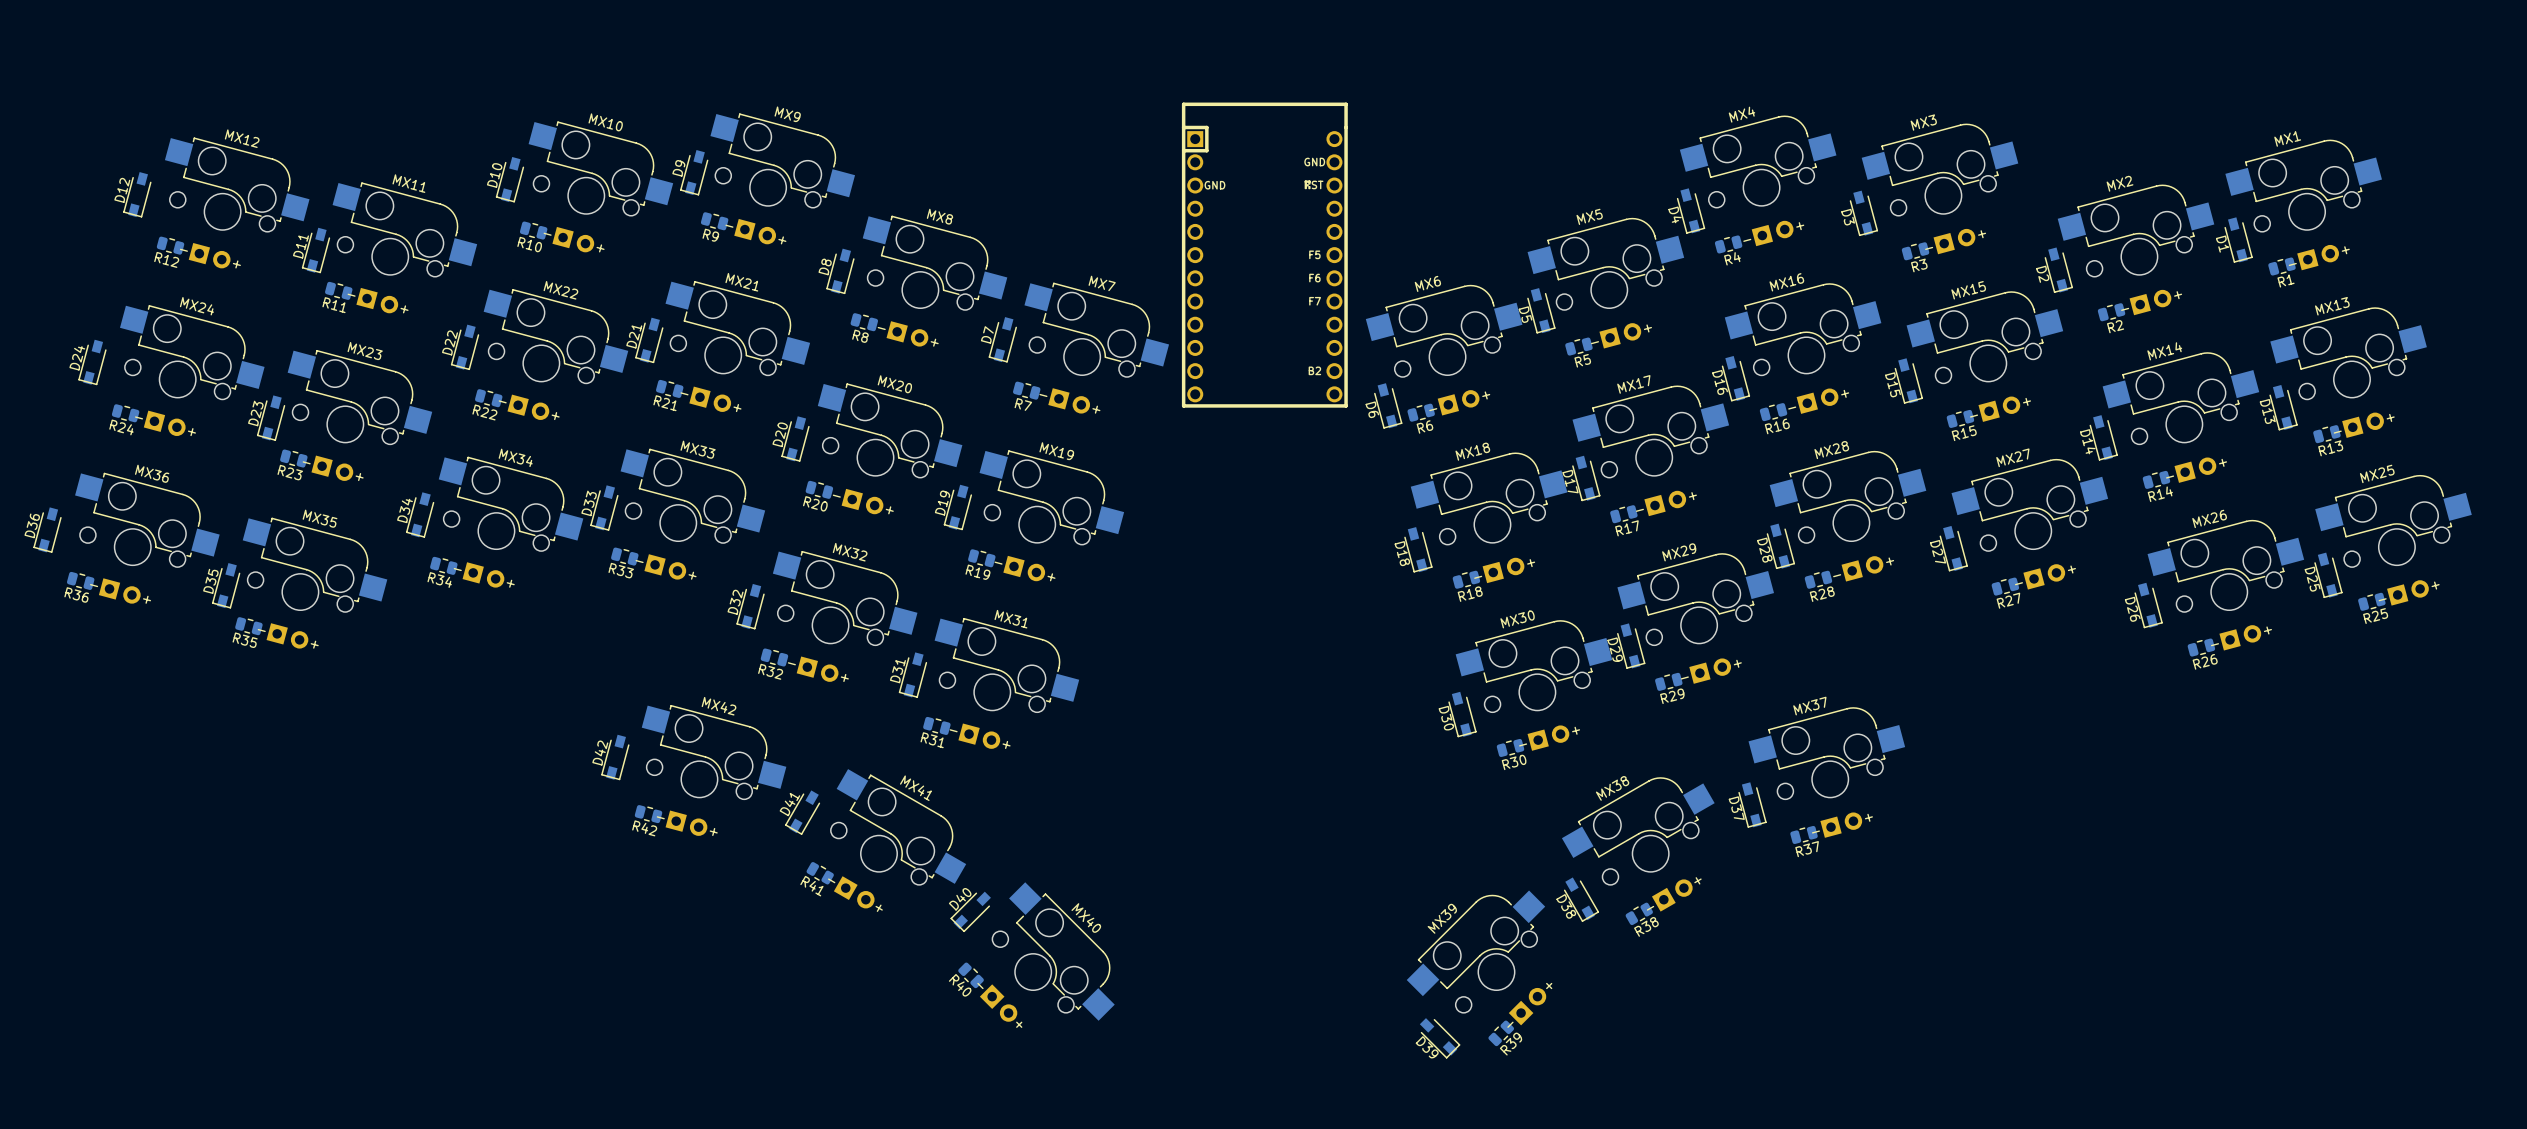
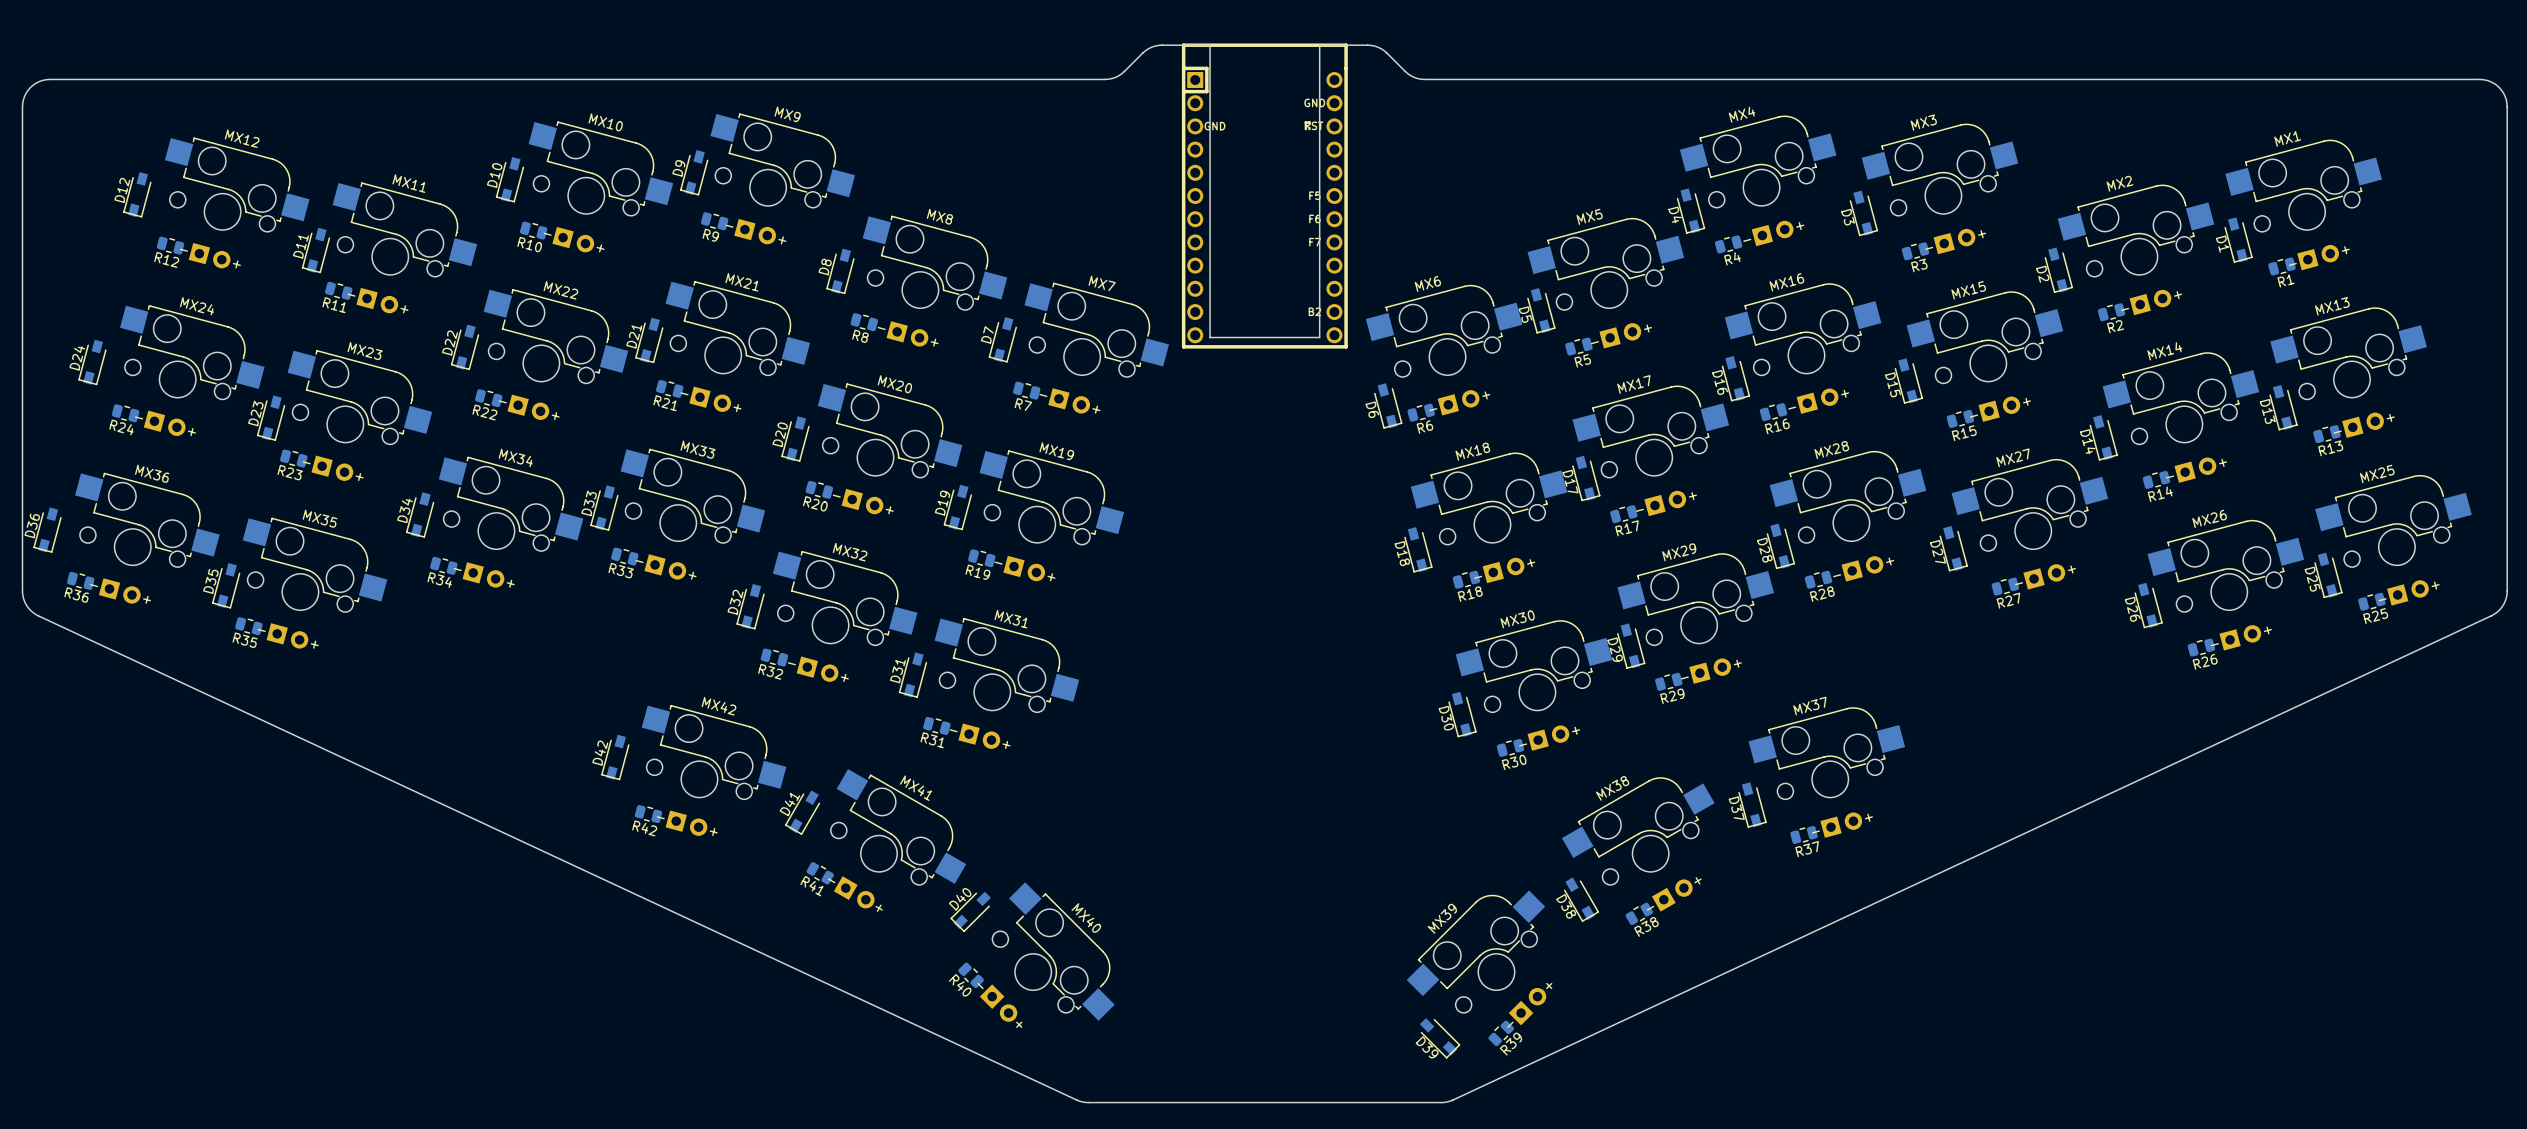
board edge: none -> (1367, 45) (1319, 45) (1319, 337) (1210, 337) (1210, 45) (1154, 46) (1145, 50) (1121, 73) (1105, 79) (49, 79) (39, 81) (28, 90) (22, 106) (22, 590) (24, 600) (28, 608) (38, 615) (1076, 1100) (1088, 1102) (1450, 1101) (2491, 615) (2499, 610) (2504, 603) (2507, 590) (2507, 106) (2503, 93) (2490, 81) (2479, 79) (1424, 79) (1407, 73) (1381, 48) (1367, 45)
part position: (1264, 255) -> (1264, 196)

